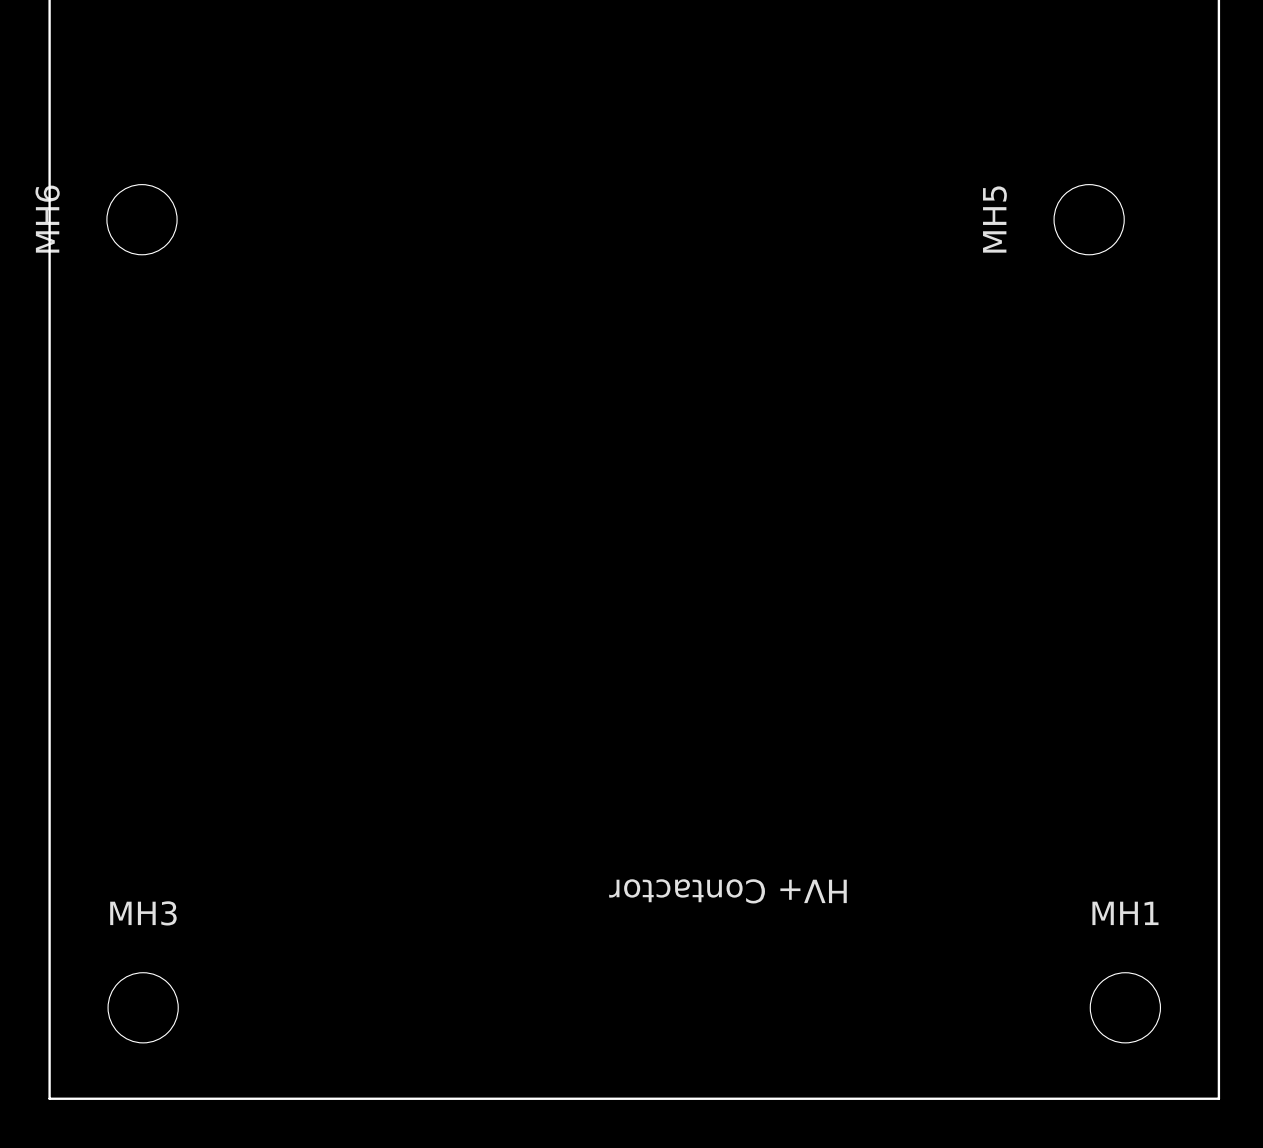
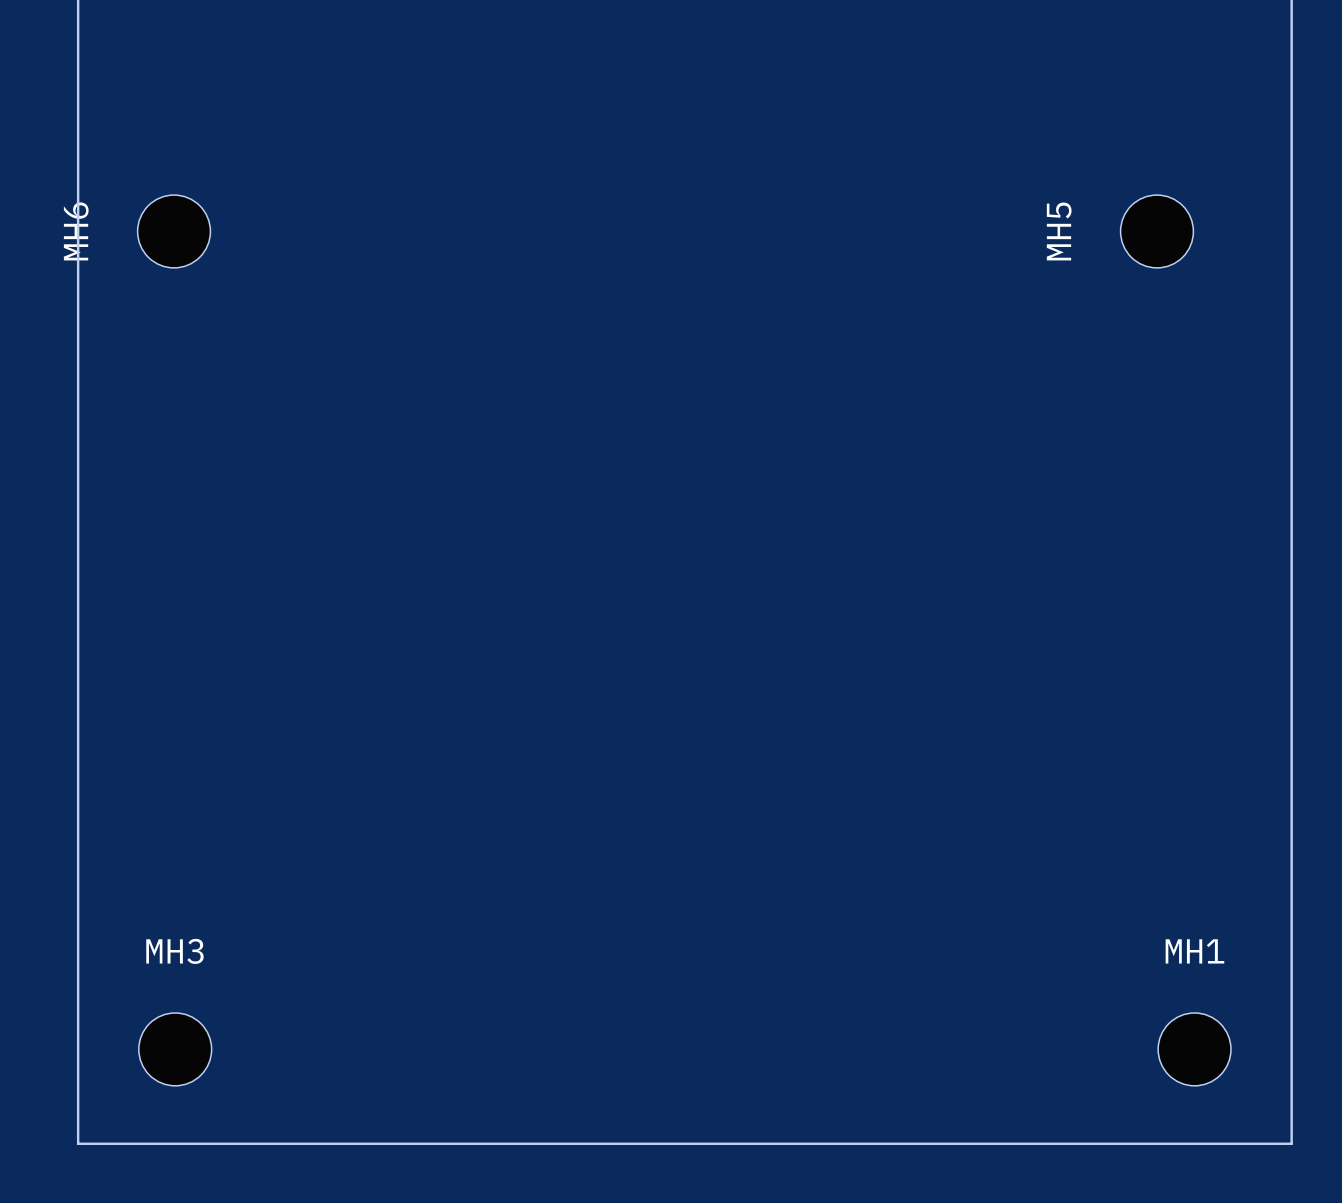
text: HV+ Contactor (727, 891) -> none

